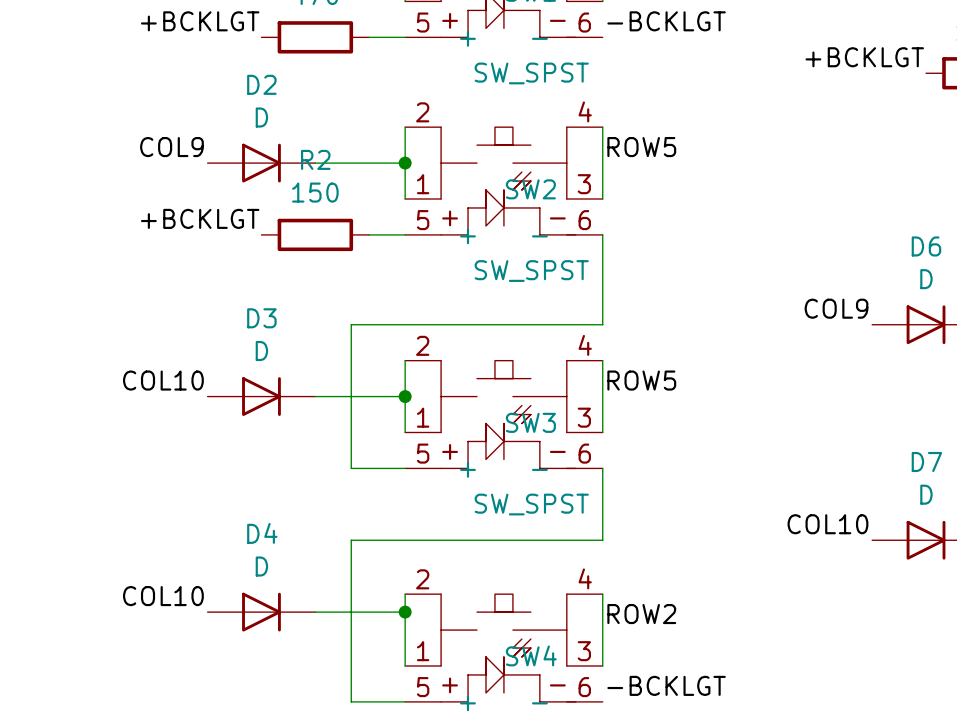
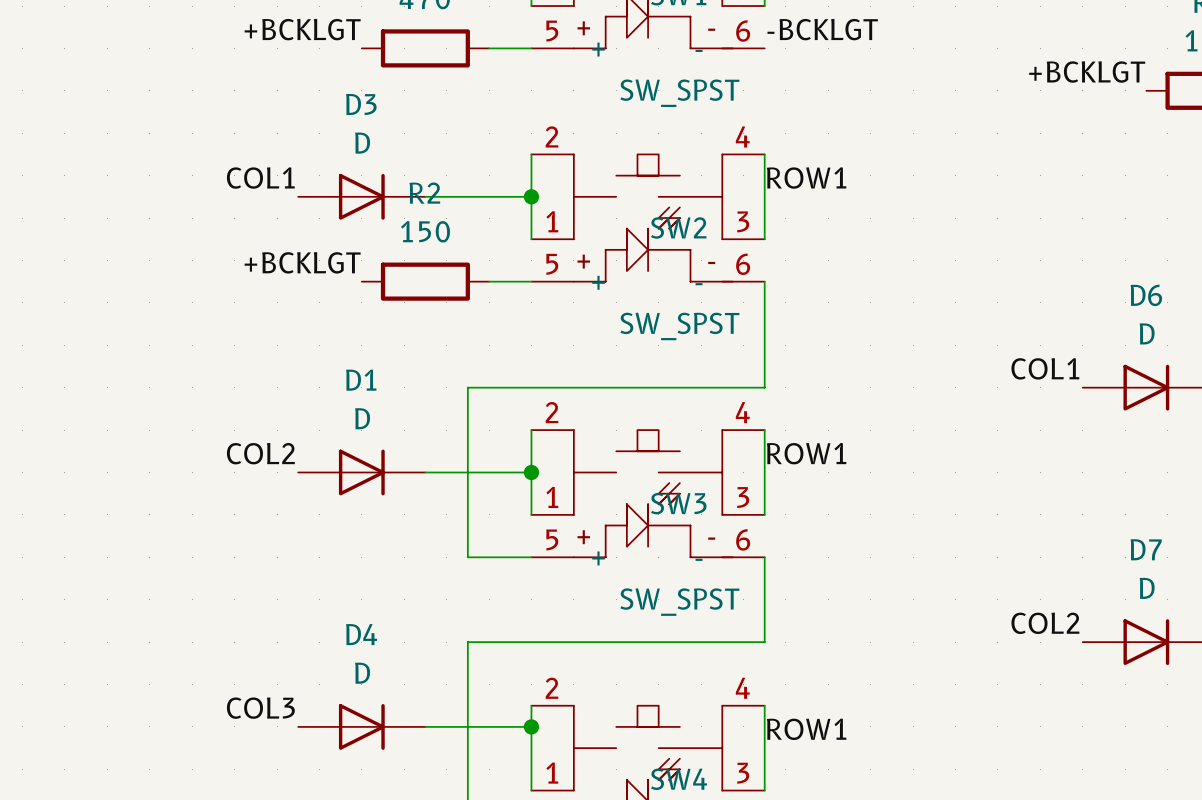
D2 name: D2 (261, 84) -> D3 (361, 104)
label: COL9 (171, 147) -> COL1 (260, 178)
label: ROW5 (641, 147) -> ROW1 (806, 178)
label: COL9 (836, 308) -> COL1 (1045, 368)
D3 name: D3 (261, 318) -> D1 (361, 380)
label: COL10 (163, 380) -> COL2 (260, 453)
label: ROW5 (641, 380) -> ROW1 (806, 453)
label: COL10 (827, 524) -> COL2 (1045, 623)
label: COL10 (163, 596) -> COL3 (260, 708)
label: ROW2 (641, 614) -> ROW1 (806, 729)

